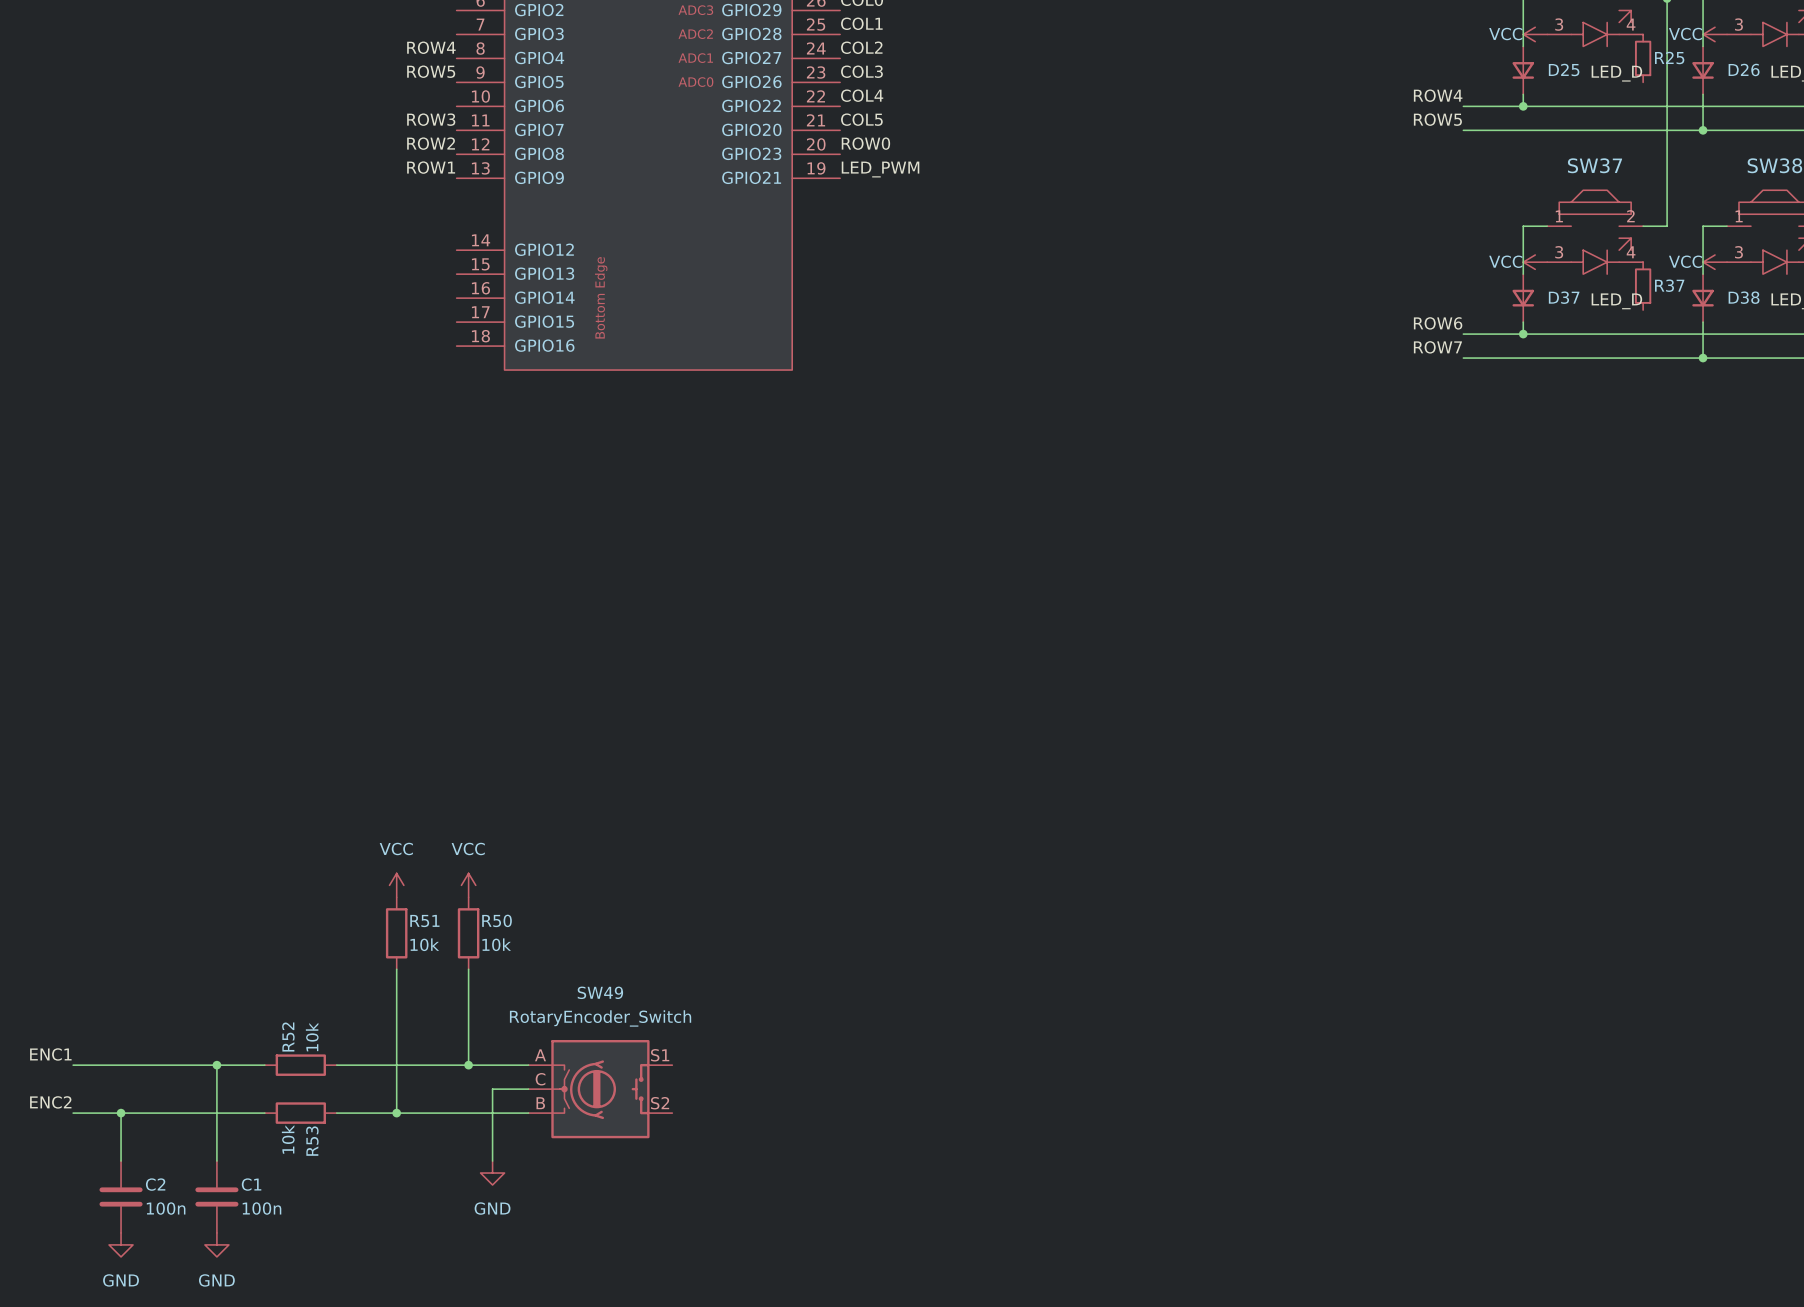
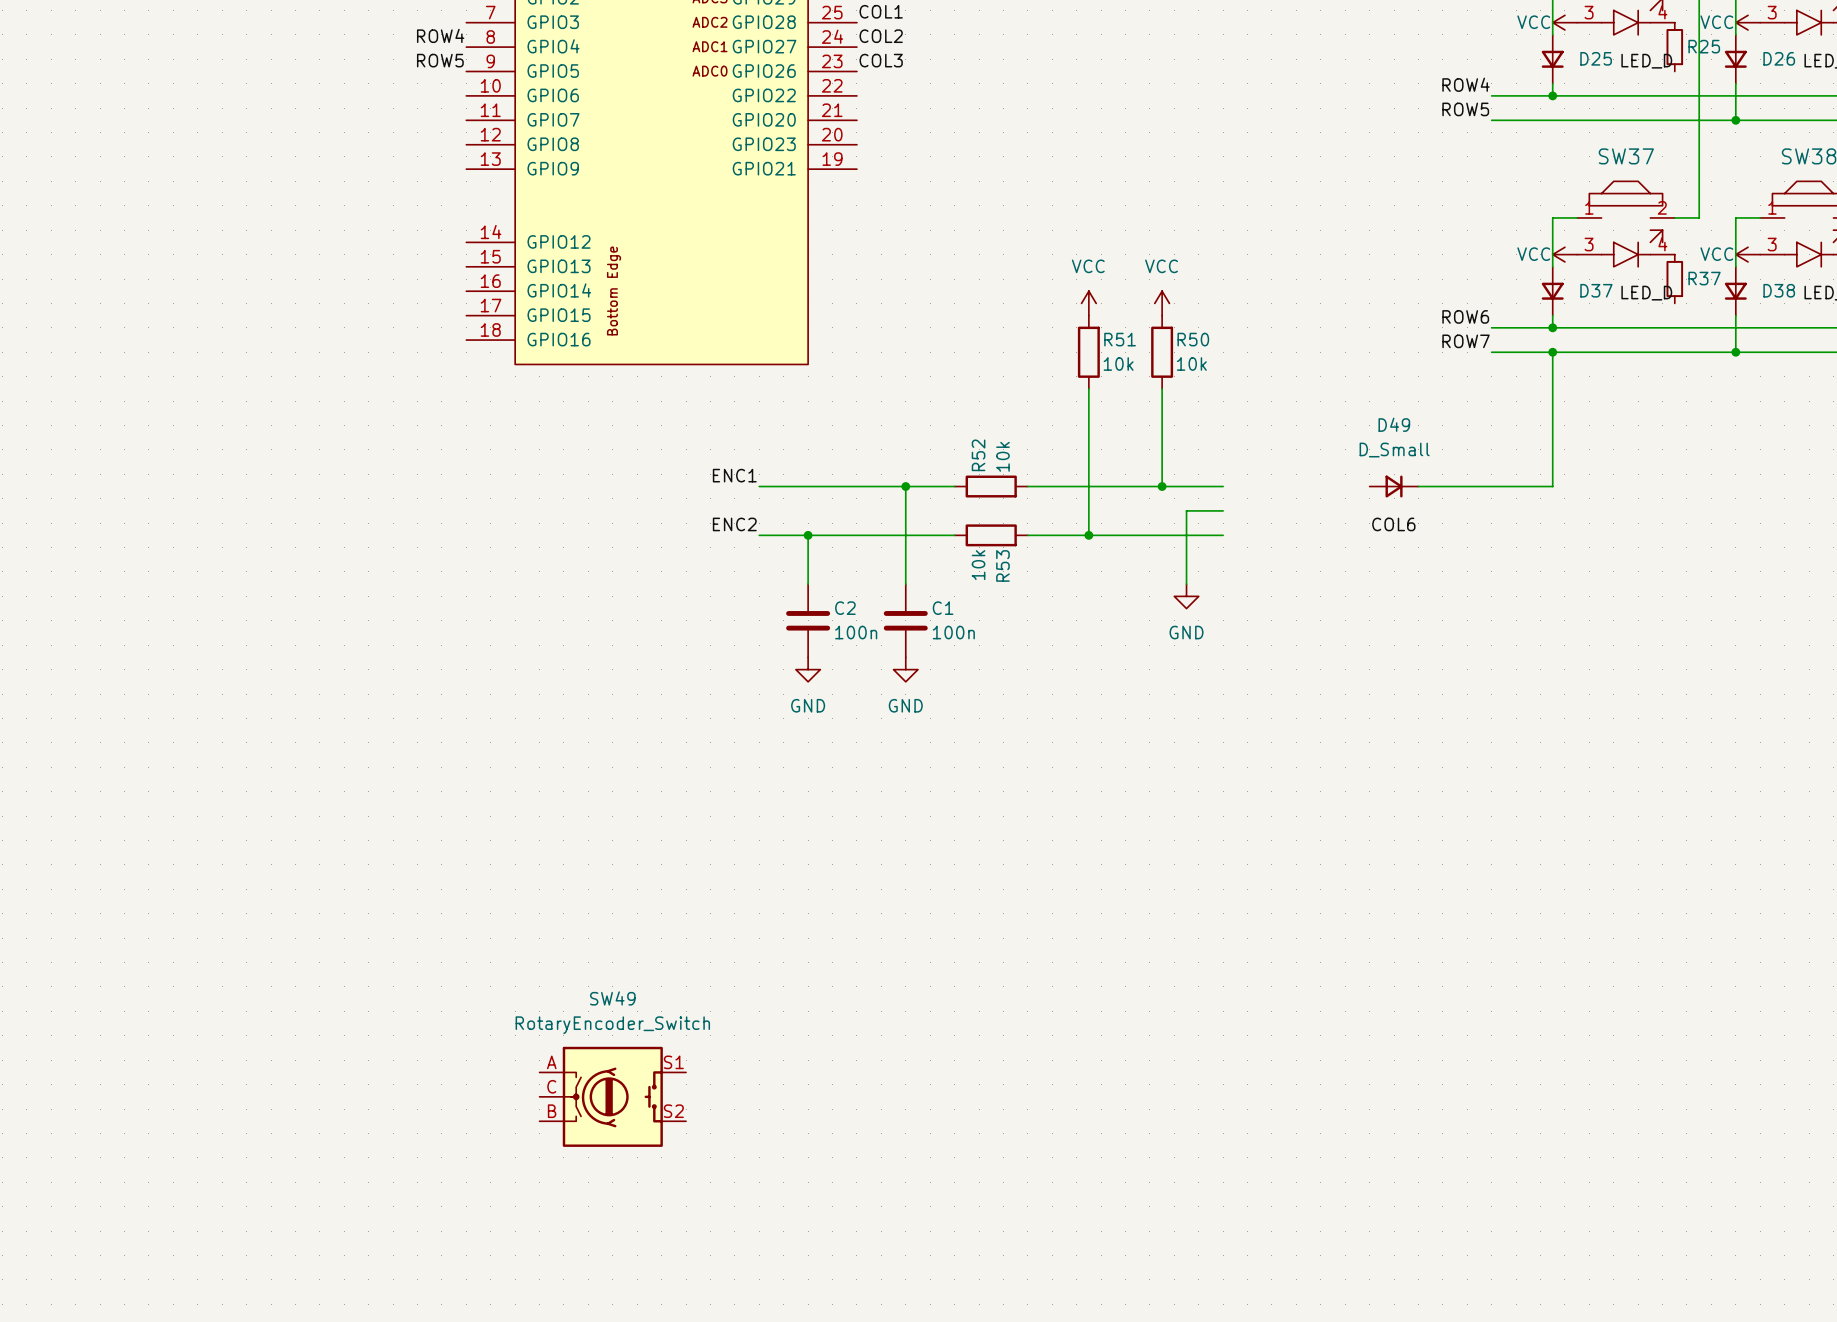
label: COL4 (862, 95) -> none
label: ROW3 (431, 119) -> none
label: COL5 (861, 119) -> none
label: ROW2 (431, 143) -> none
label: ROW0 (865, 143) -> none
label: ROW1 (431, 167) -> none
label: LED_PWM (880, 169) -> none
power symbol: none -> VCC (1088, 303)
power symbol: none -> VCC (1162, 303)
wire: none -> (1552, 352) (1552, 486) (1418, 486)
junction: none -> (1552, 352)
wire: none -> (1088, 388) (1088, 535)
wire: none -> (1162, 388) (1162, 486)
label: none -> ENC1 (734, 475)
wire: none -> (759, 486) (954, 486)
wire: none -> (905, 486) (905, 584)
junction: none -> (905, 486)
wire: none -> (1027, 486) (1223, 486)
junction: none -> (1162, 486)
D49: none -> D_Small (1394, 486)
wire: none -> (1223, 510) (1186, 510) (1186, 584)
label: none -> ENC2 (734, 524)
label: none -> COL6 (1393, 524)
wire: none -> (759, 535) (954, 535)
wire: none -> (808, 535) (808, 584)
junction: none -> (808, 535)
wire: none -> (1027, 535) (1223, 535)
junction: none -> (1088, 535)
power symbol: none -> GND (1186, 596)
power symbol: none -> GND (808, 669)
power symbol: none -> GND (905, 669)
power symbol: VCC (396, 885) -> none
power symbol: VCC (468, 885) -> none
R51 position: (396, 933) -> (1088, 352)
R50 position: (468, 933) -> (1162, 352)
wire: (396, 969) (396, 1113) -> none
wire: (468, 969) (468, 1065) -> none
label: ENC1 (50, 1054) -> none
wire: (73, 1065) (264, 1065) -> none
wire: (216, 1065) (216, 1161) -> none
junction: (216, 1065) -> none
R52 position: (300, 1065) -> (991, 486)
wire: (336, 1065) (528, 1065) -> none
junction: (468, 1065) -> none
wire: (528, 1089) (492, 1089) (492, 1161) -> none
label: ENC2 (50, 1102) -> none
wire: (73, 1113) (264, 1113) -> none
wire: (121, 1113) (121, 1161) -> none
junction: (121, 1113) -> none
R53 position: (300, 1113) -> (991, 535)
wire: (336, 1113) (528, 1113) -> none
junction: (396, 1113) -> none
power symbol: GND (492, 1173) -> none
C2 position: (121, 1196) -> (808, 620)
C1 position: (216, 1196) -> (905, 620)
power symbol: GND (121, 1244) -> none
power symbol: GND (216, 1244) -> none

